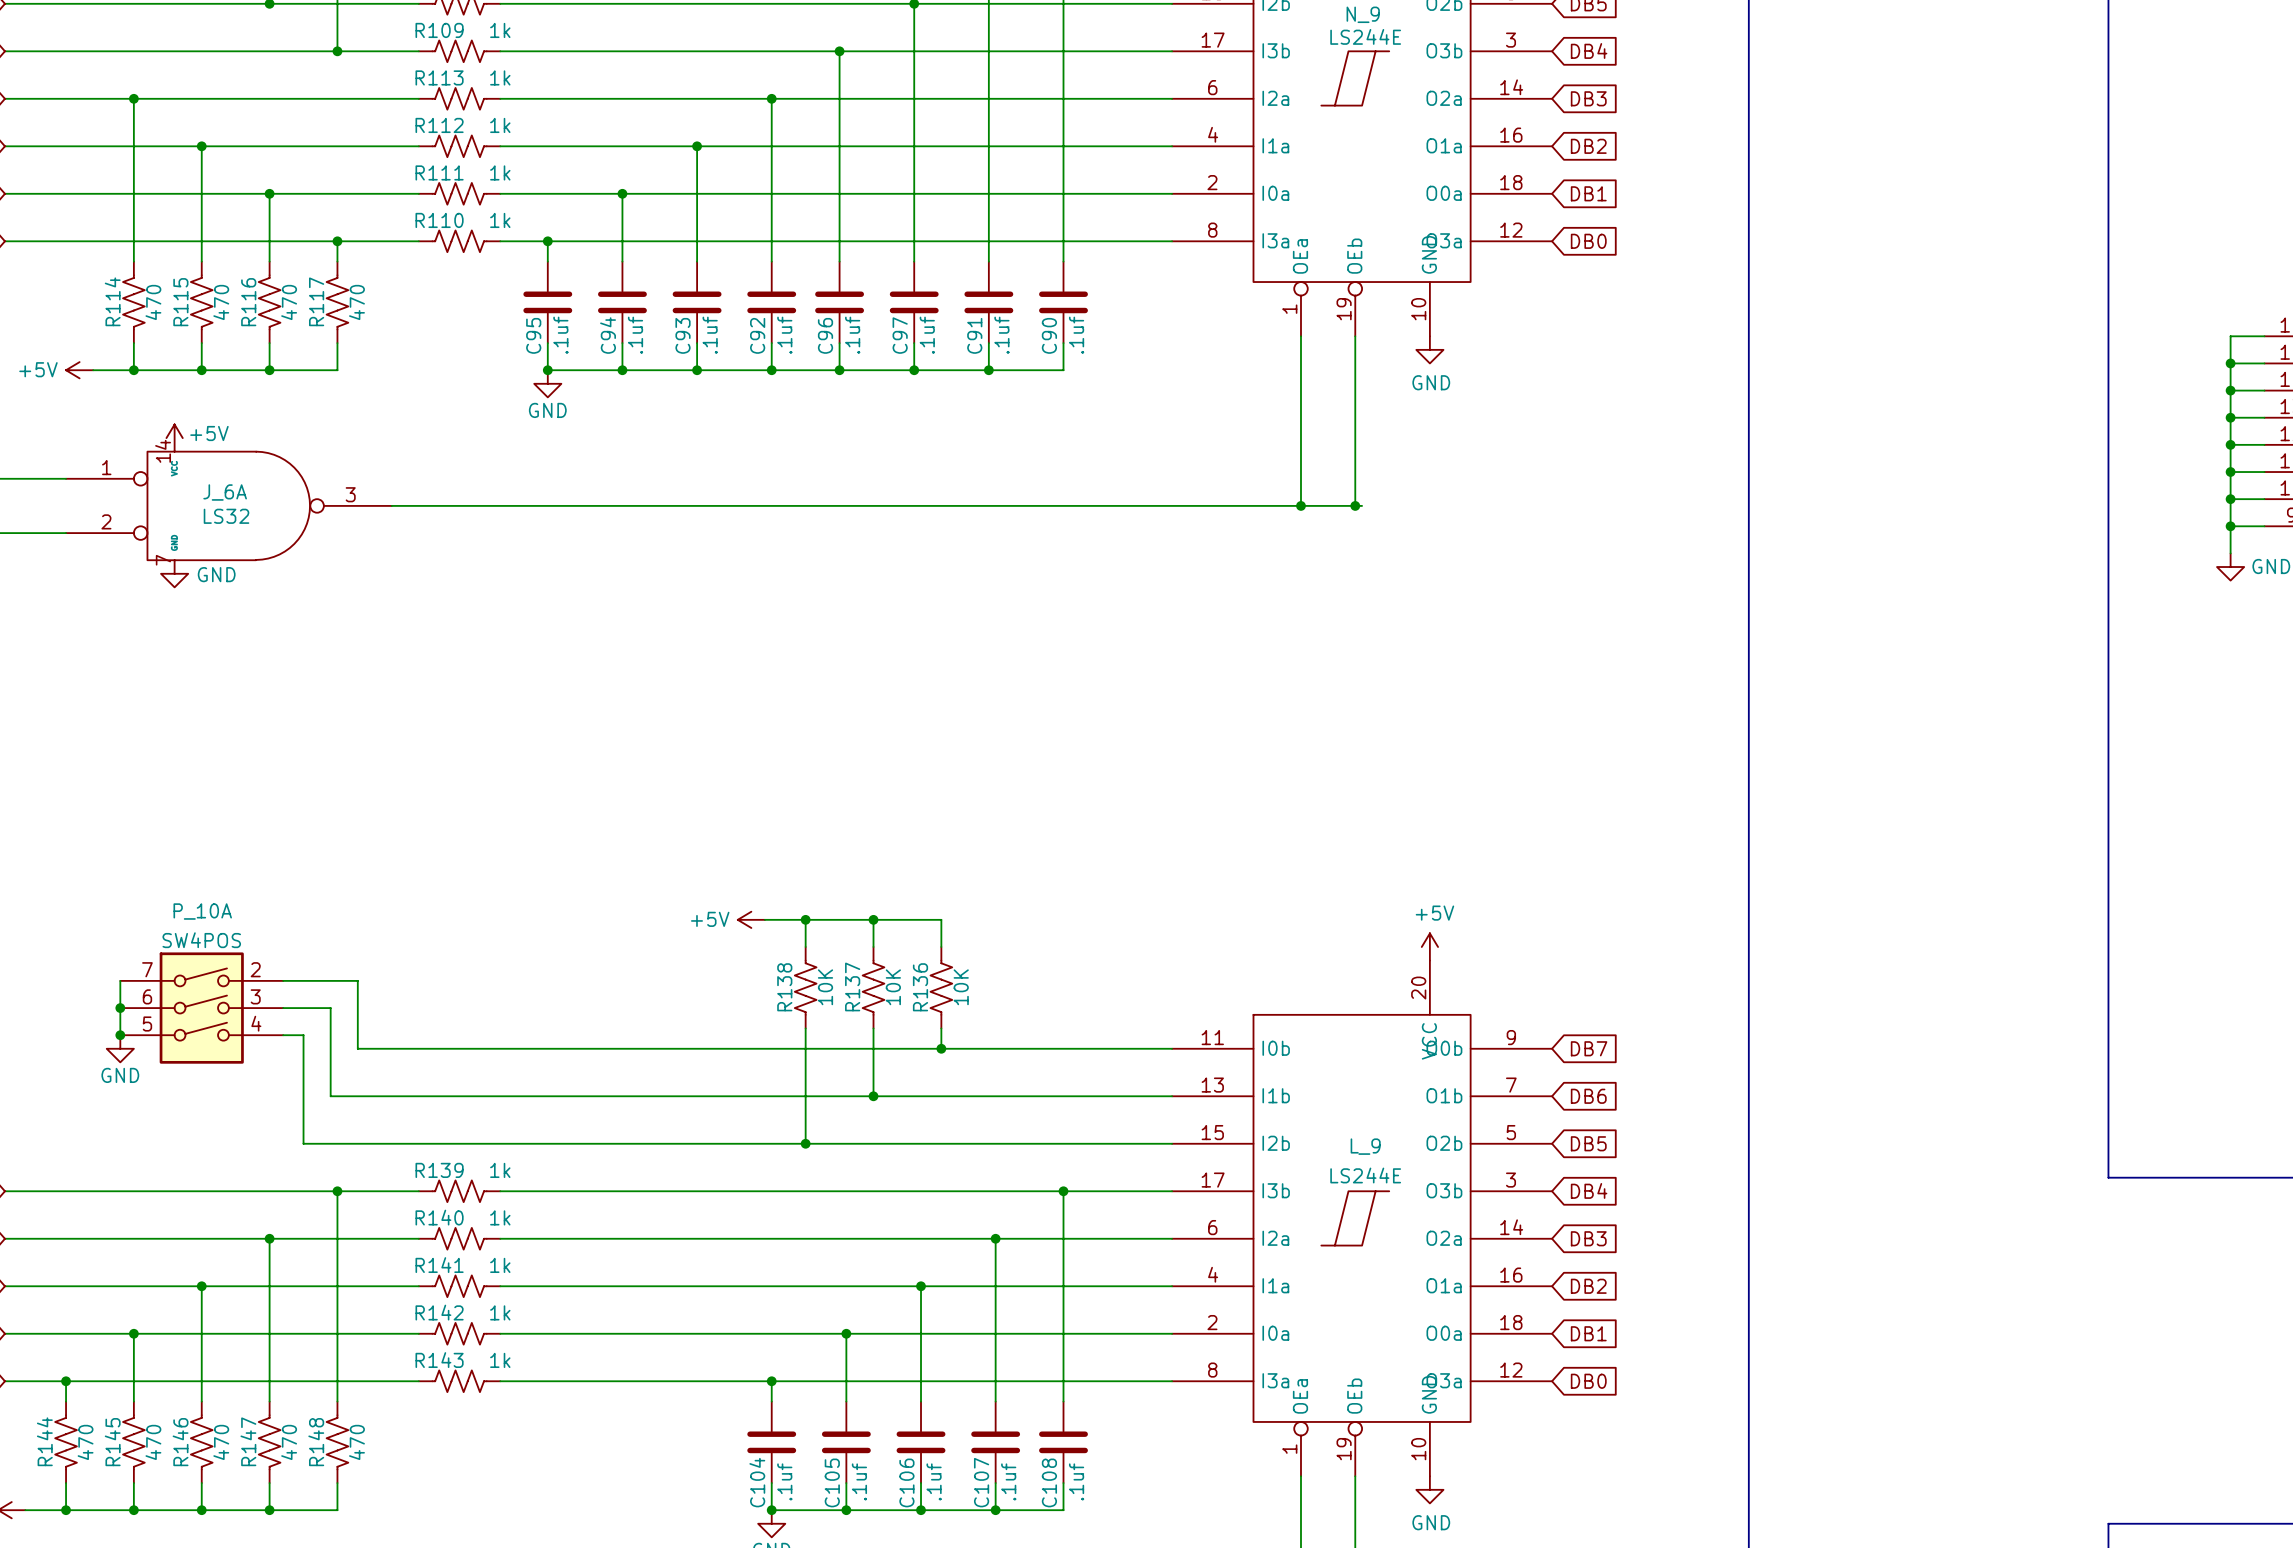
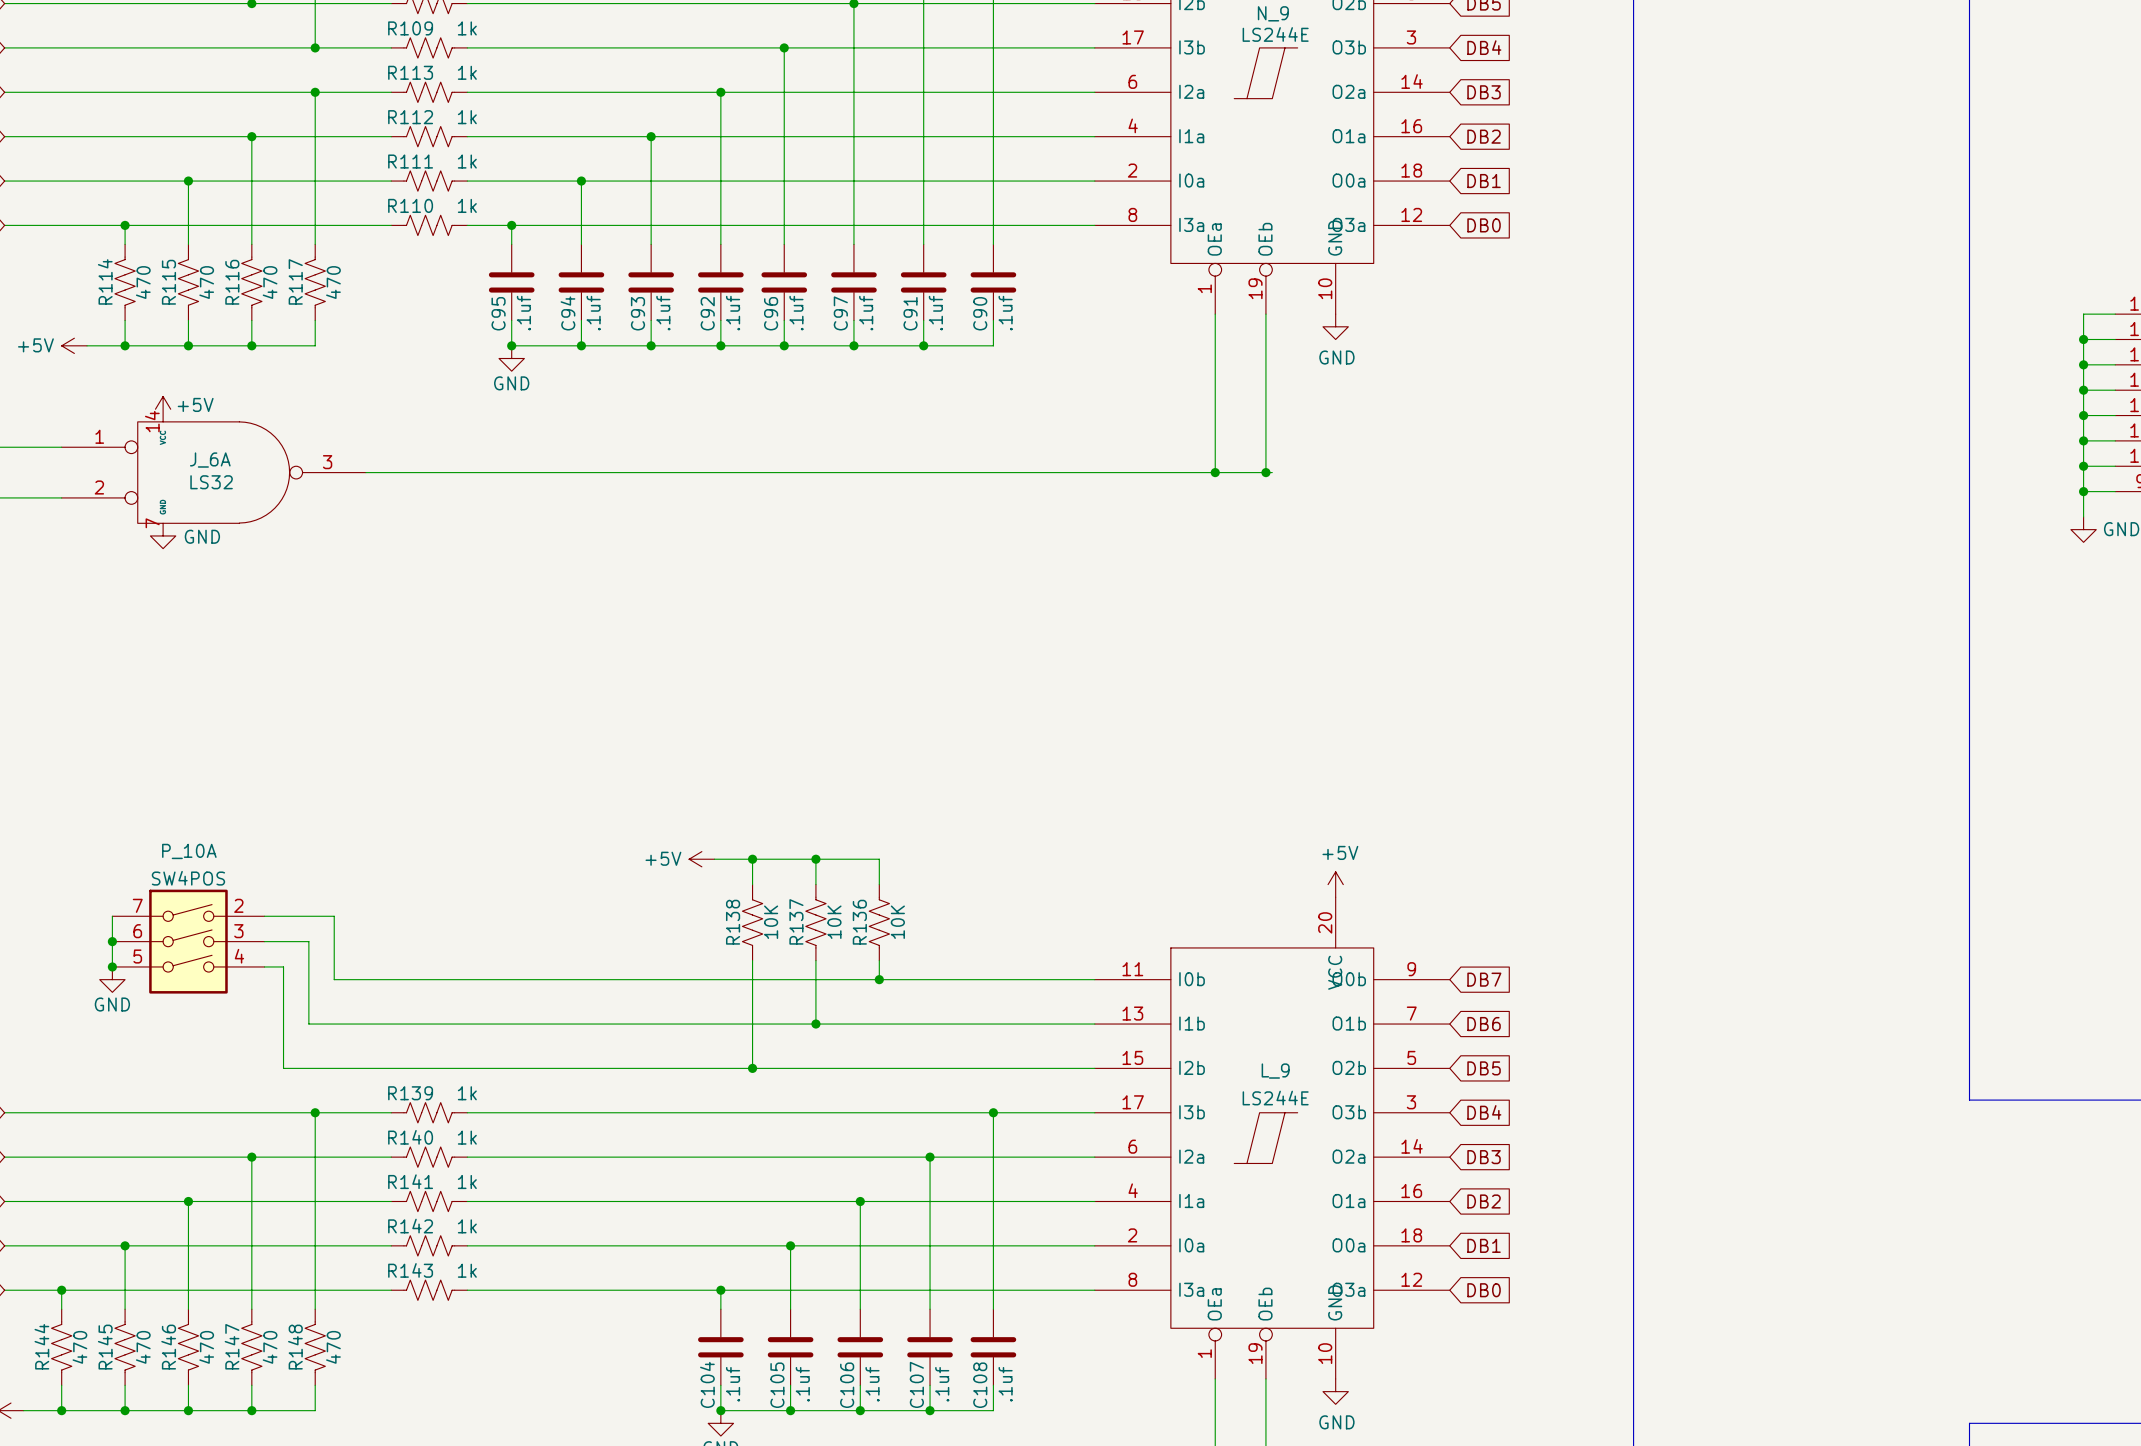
wire: (133, 98) (133, 241) -> (315, 92) (315, 225)
junction: (133, 98) -> none
junction: none -> (315, 92)
wire: (201, 146) (201, 193) -> (251, 136) (251, 181)
junction: (201, 146) -> none
junction: none -> (251, 136)
junction: none -> (188, 181)
junction: (269, 193) -> none
junction: none -> (125, 225)
junction: (337, 241) -> none

